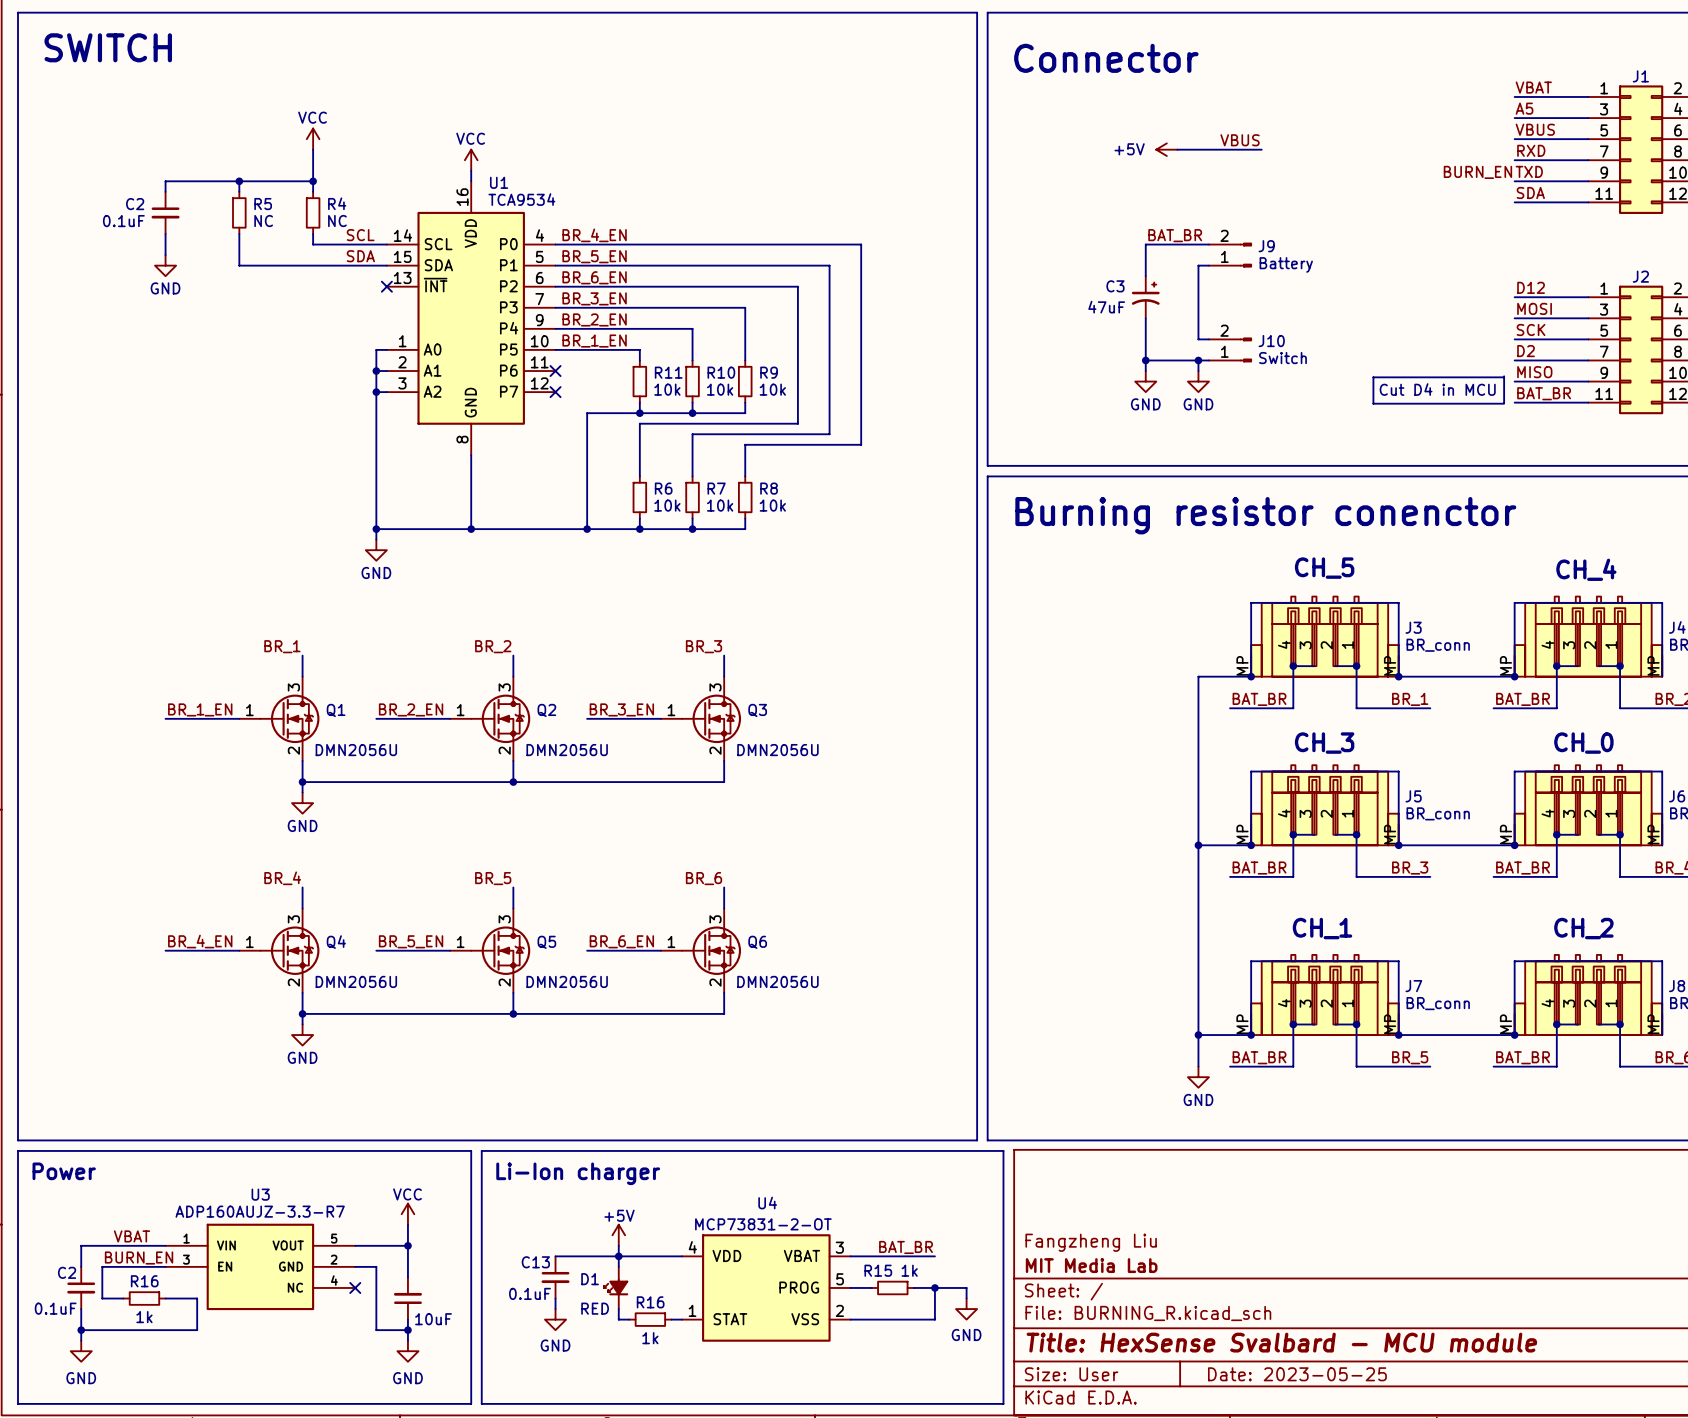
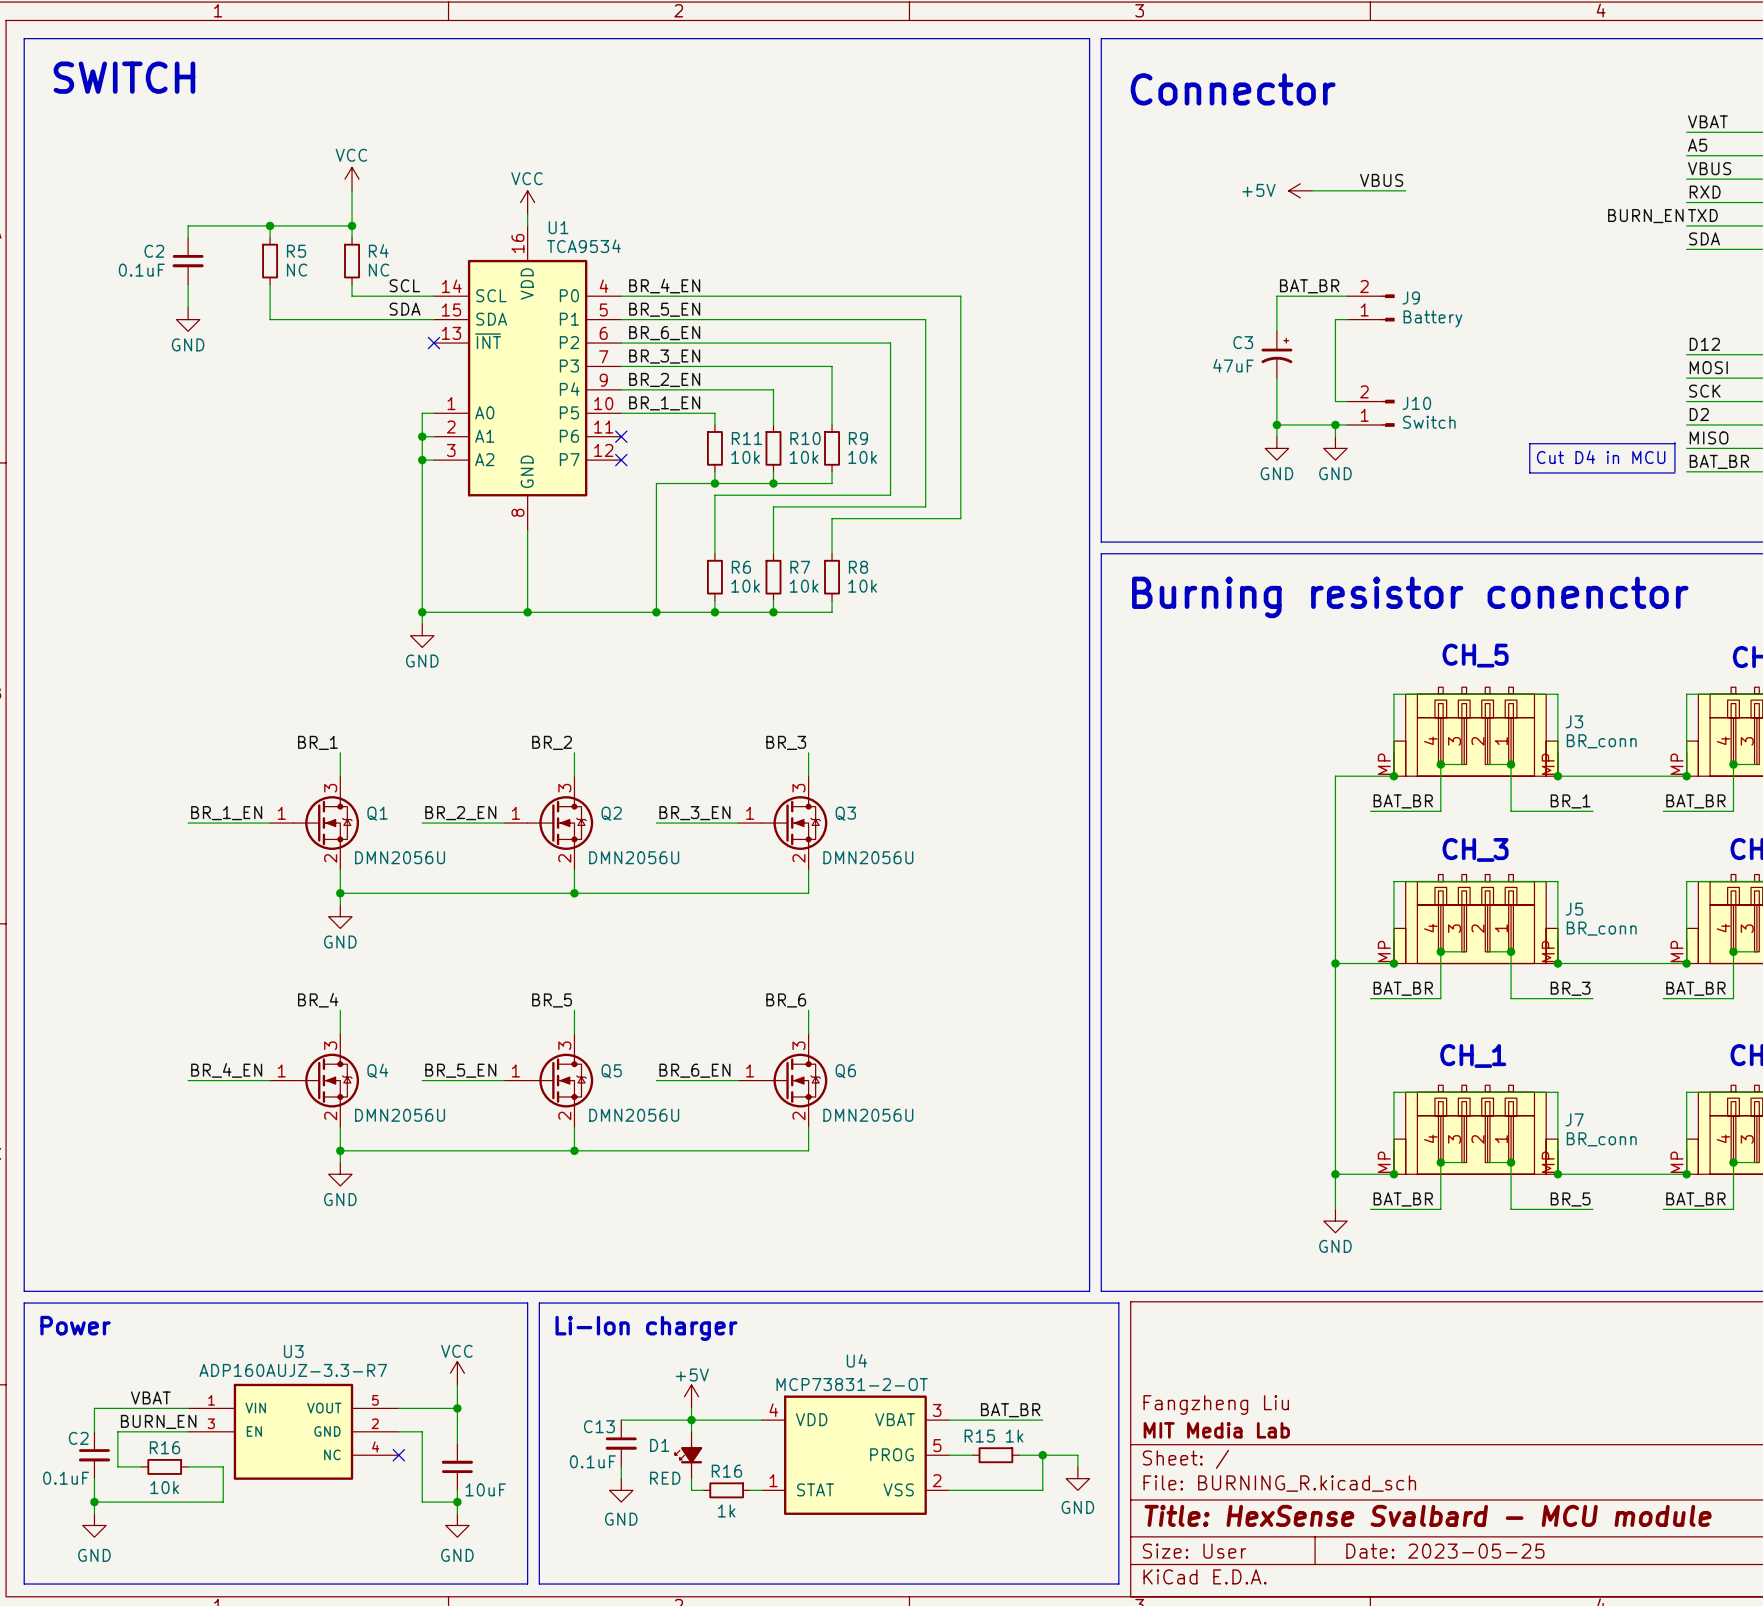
R16 value: 1k (144, 1317) -> 10k (164, 1487)

